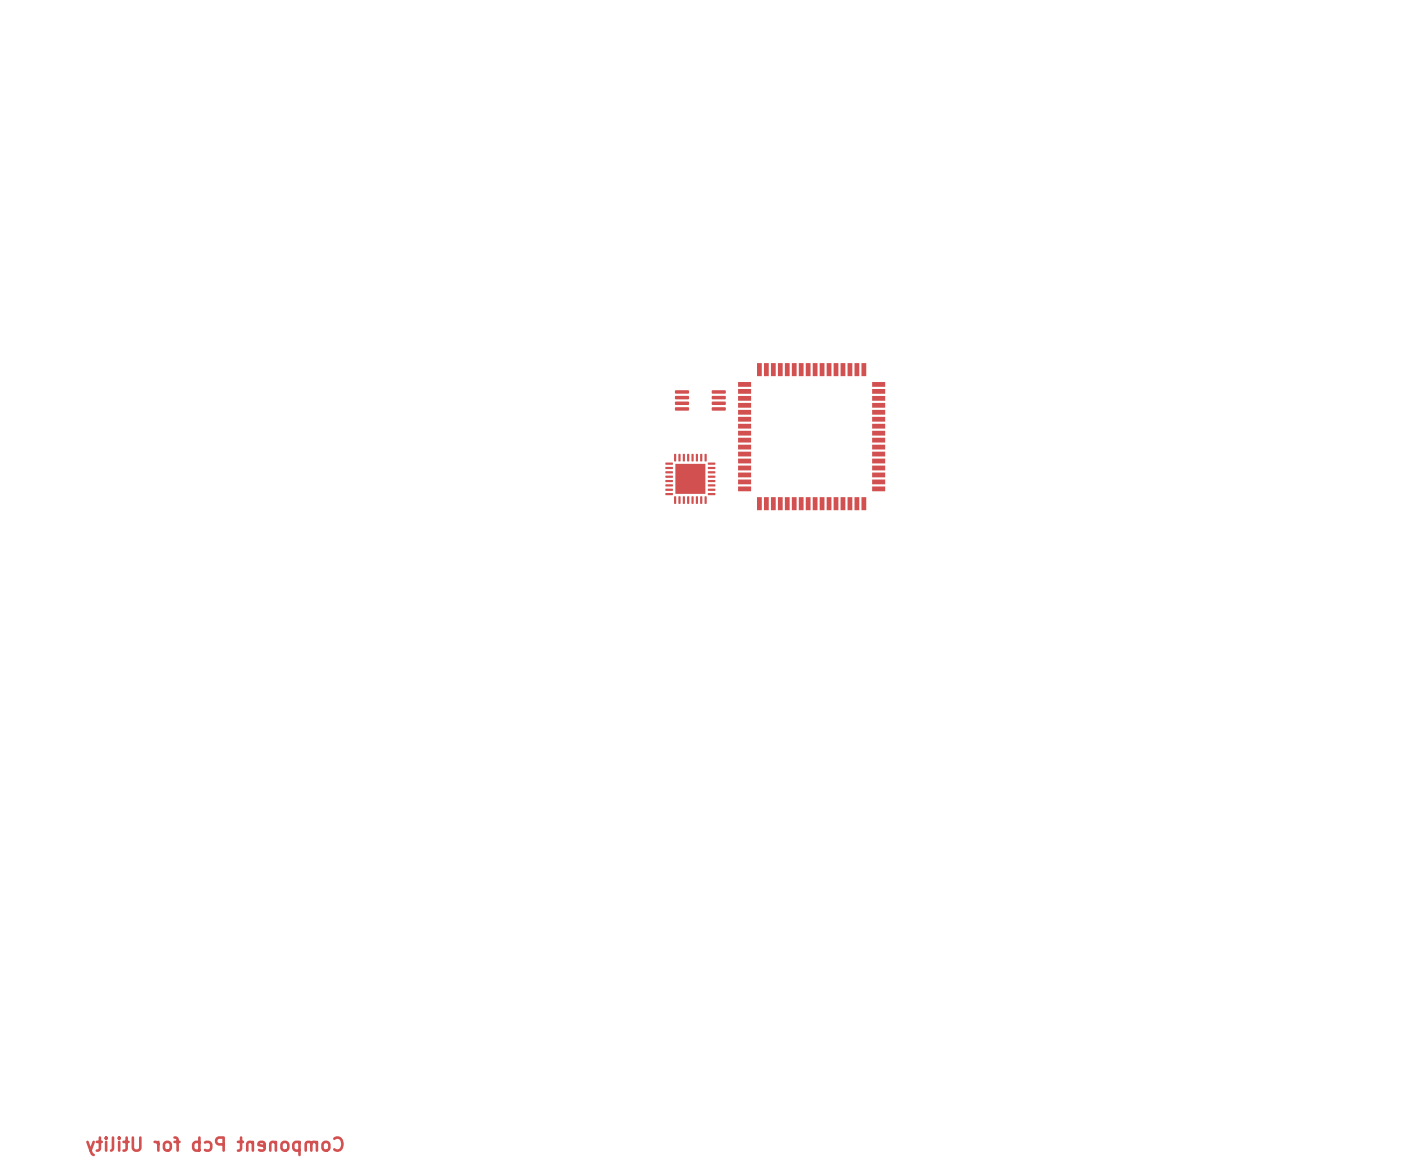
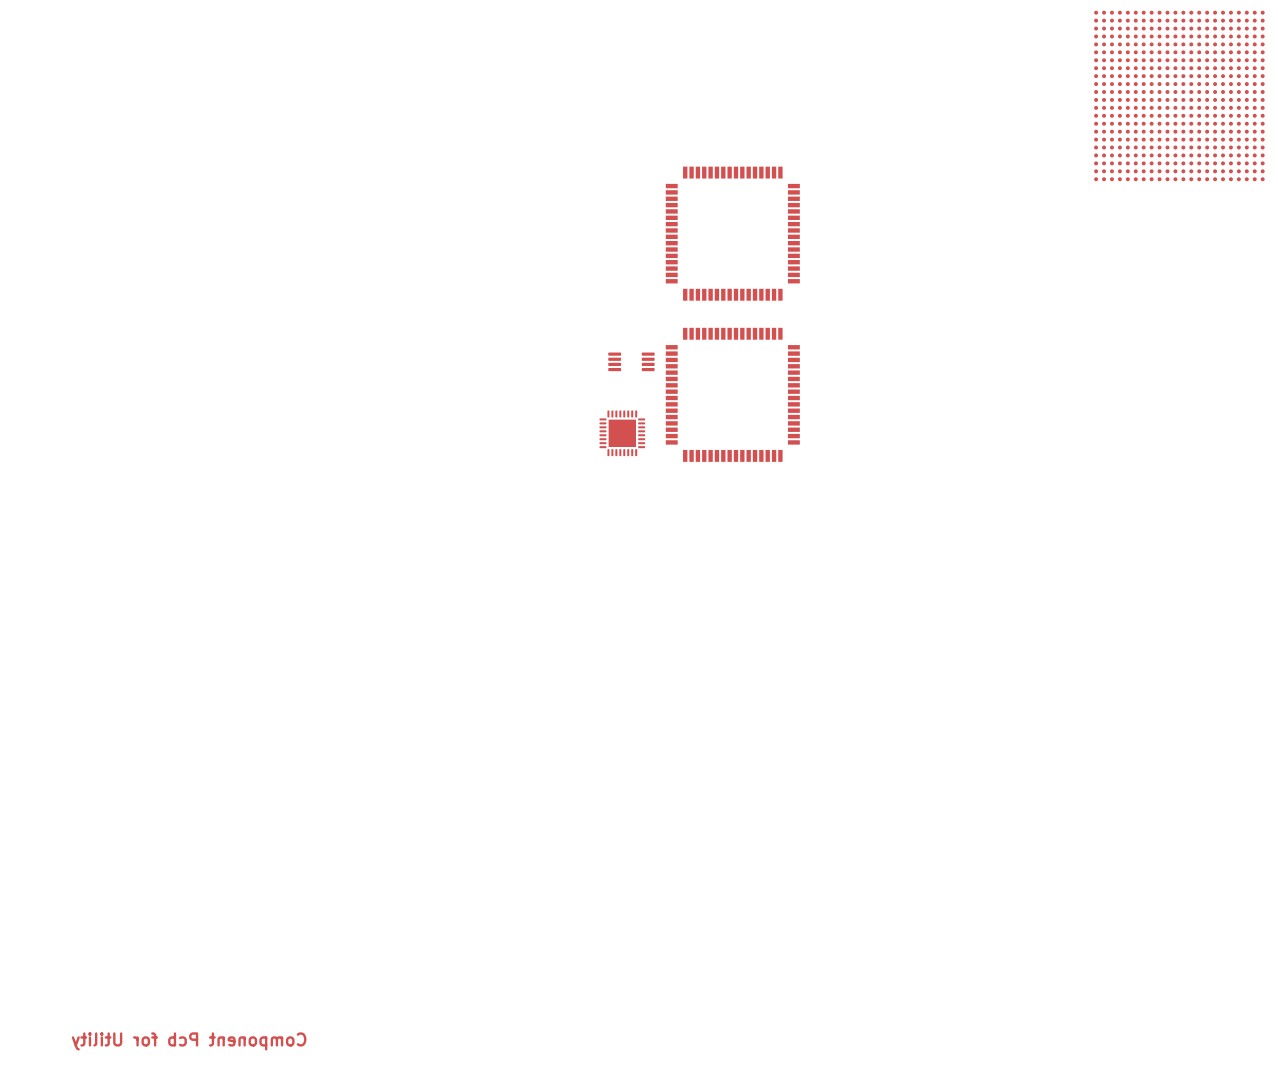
part: none -> (1179, 95)
part: none -> (732, 233)

